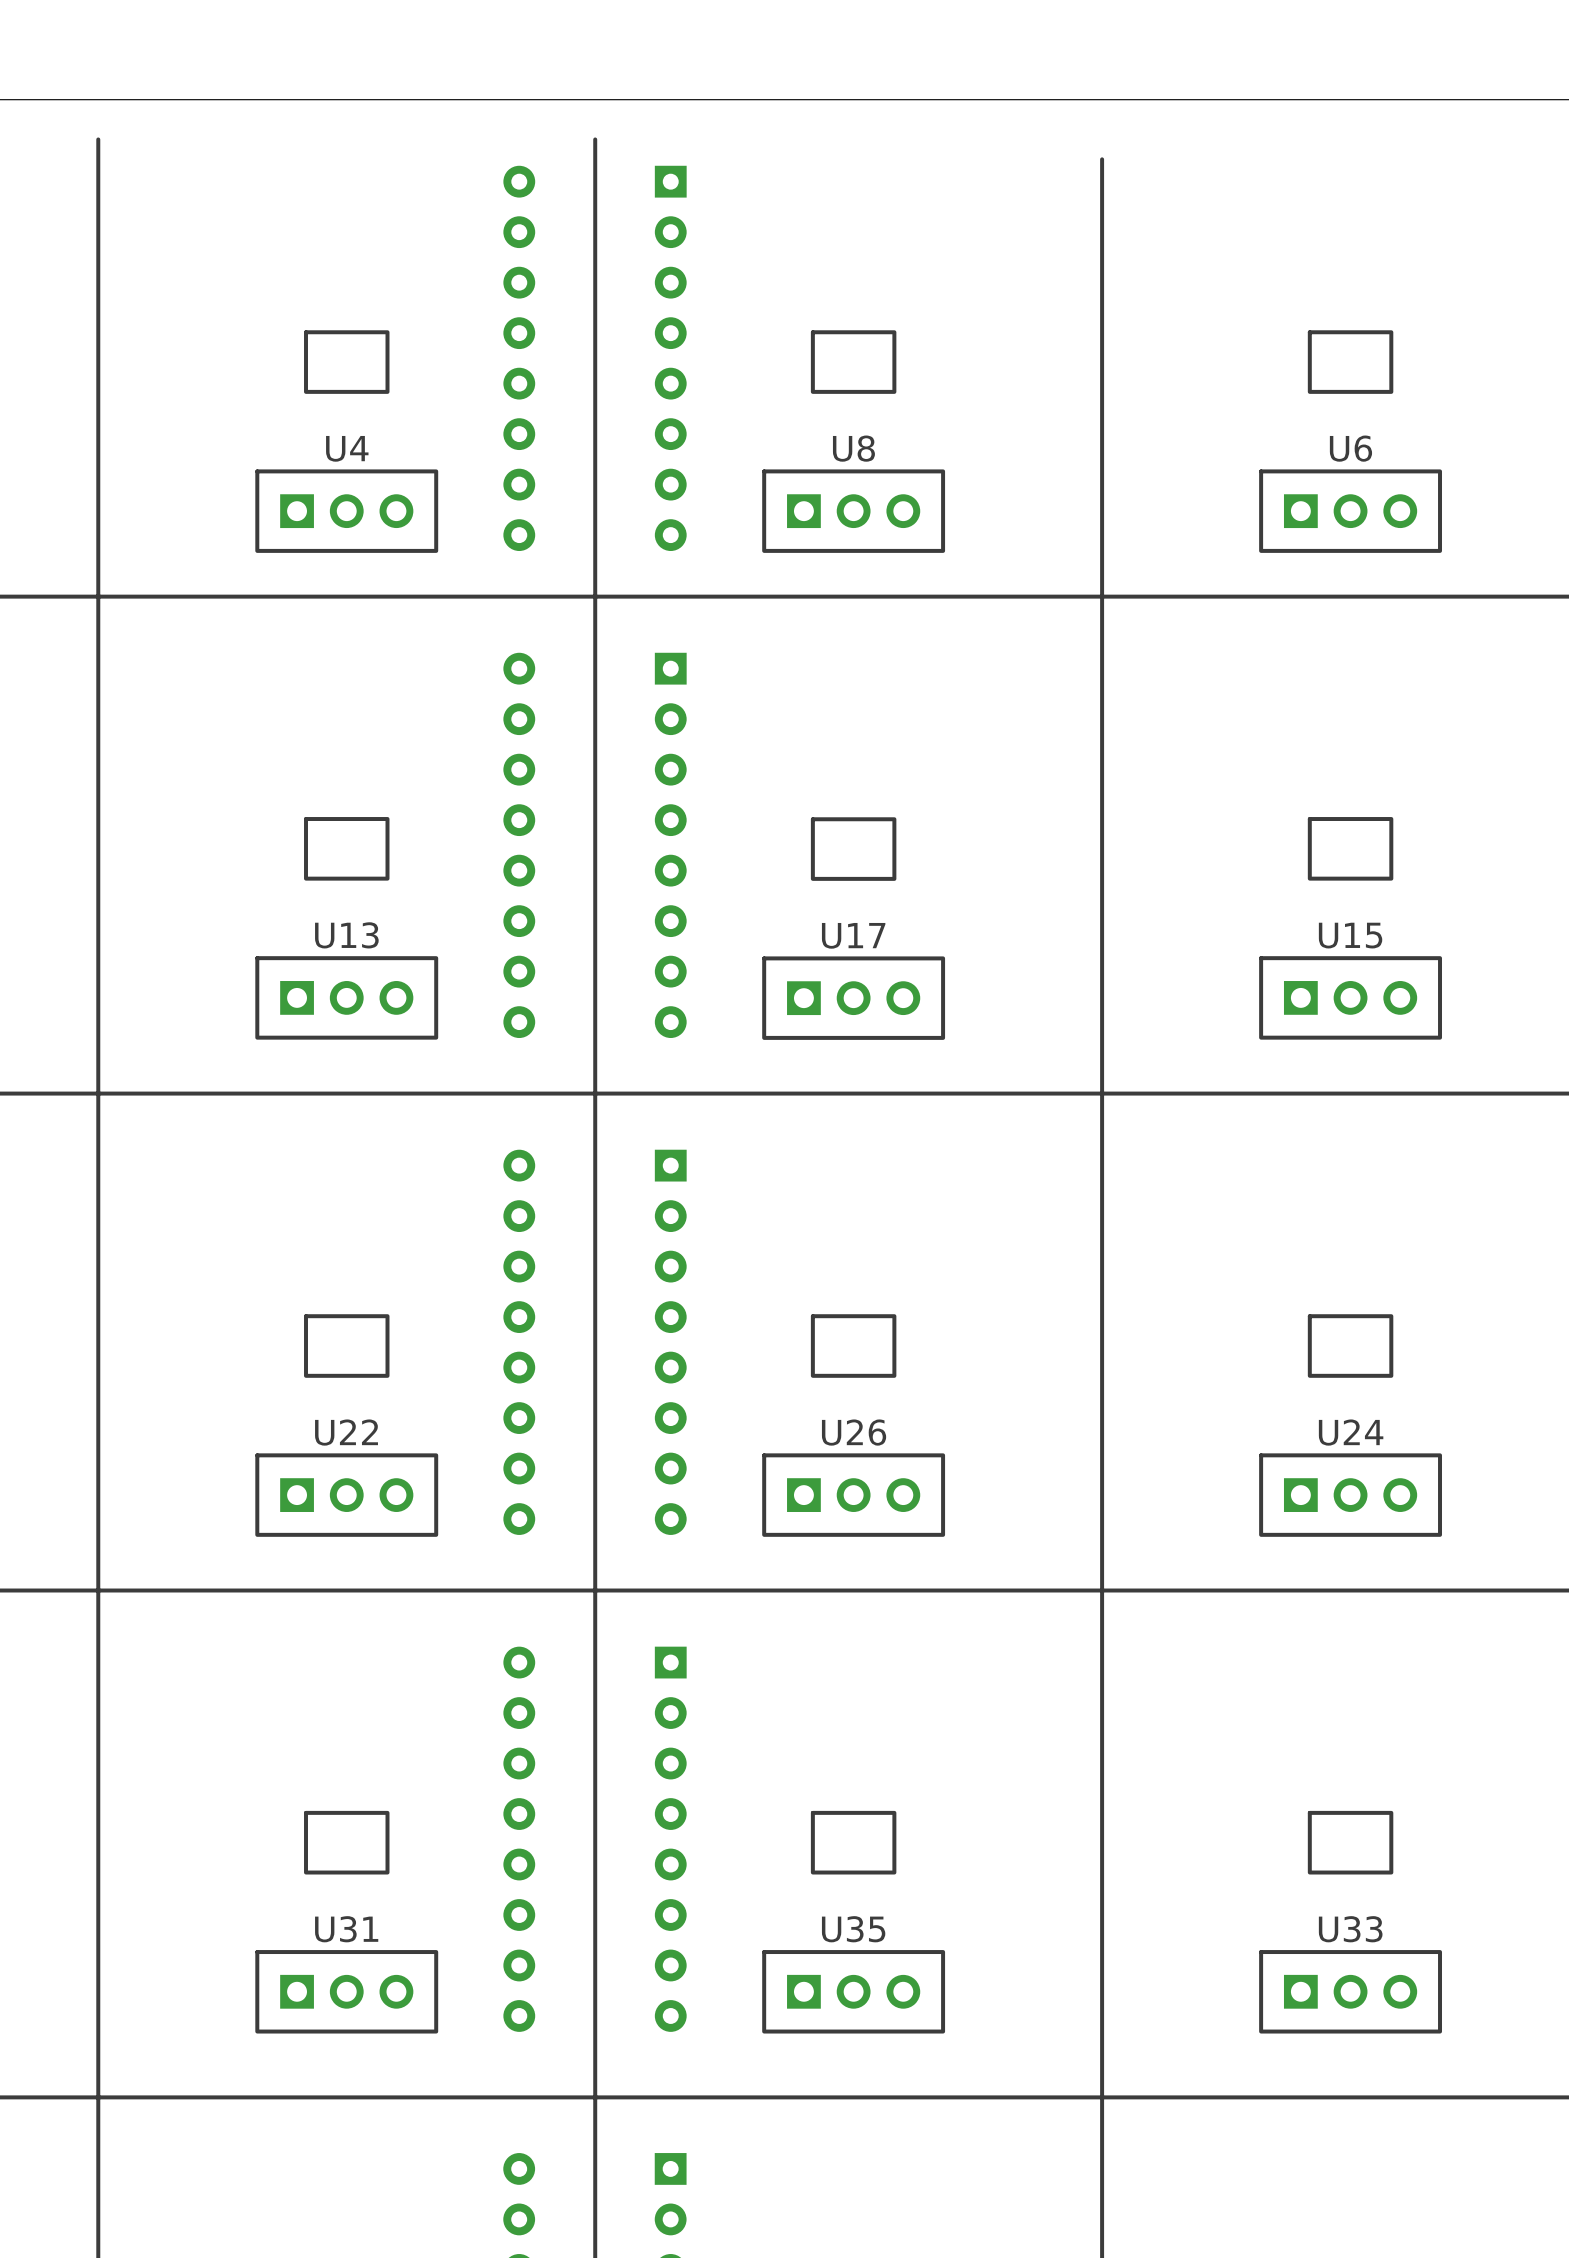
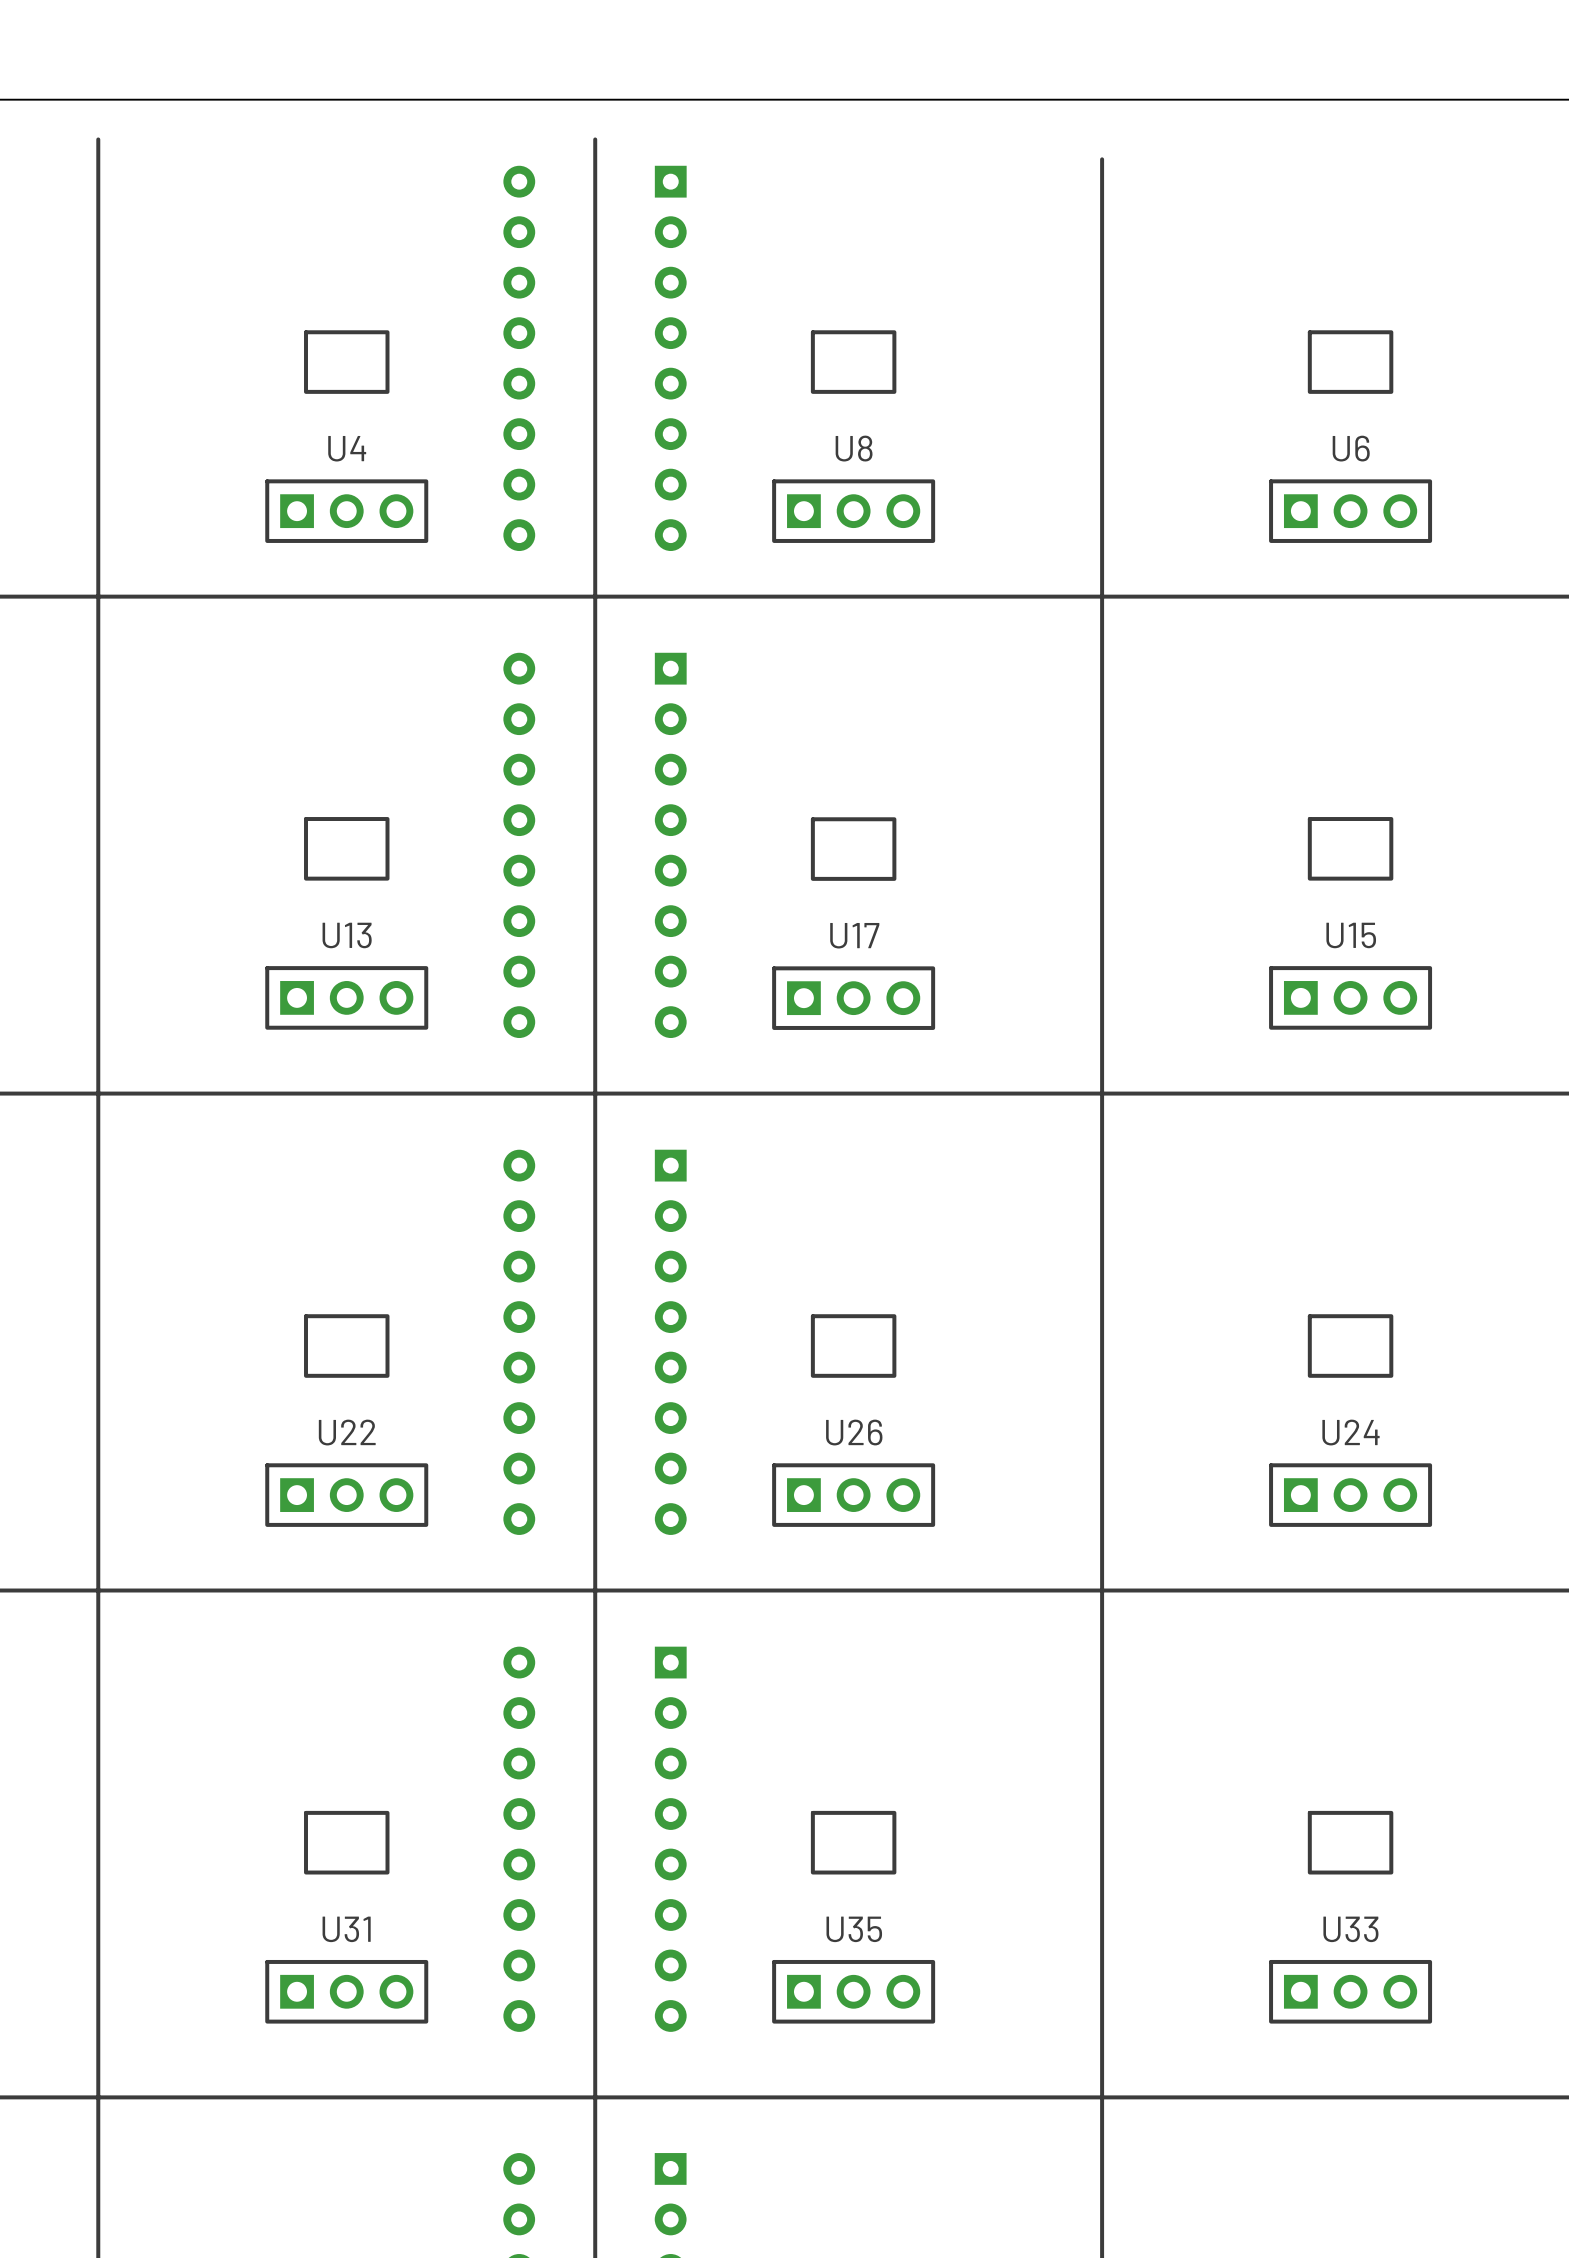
U4 footprint: [255, 330, 439, 553] -> [265, 330, 429, 543]
U8 footprint: [762, 330, 946, 553] -> [772, 330, 936, 543]
U6 footprint: [1259, 330, 1443, 553] -> [1269, 330, 1433, 543]
U13 footprint: [255, 817, 439, 1040] -> [265, 817, 429, 1030]
U17 footprint: [762, 817, 946, 1040] -> [772, 817, 936, 1030]
U15 footprint: [1259, 817, 1443, 1040] -> [1269, 817, 1433, 1030]
U22 footprint: [255, 1314, 439, 1537] -> [265, 1314, 429, 1527]
U26 footprint: [762, 1314, 946, 1537] -> [772, 1314, 936, 1527]
U24 footprint: [1259, 1314, 1443, 1537] -> [1269, 1314, 1433, 1527]
U31 footprint: [255, 1810, 439, 2034] -> [265, 1810, 429, 2024]
U35 footprint: [762, 1810, 946, 2034] -> [772, 1810, 936, 2024]
U33 footprint: [1259, 1810, 1443, 2034] -> [1269, 1810, 1433, 2024]

